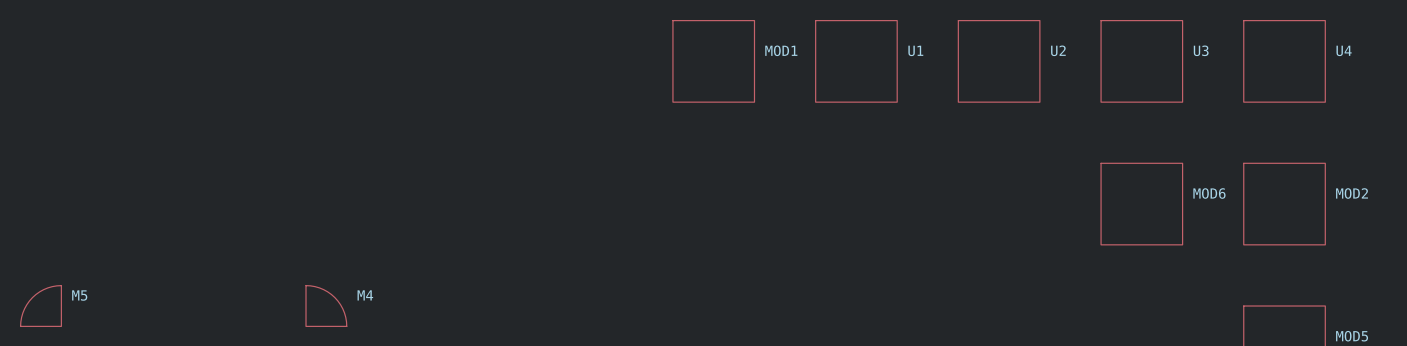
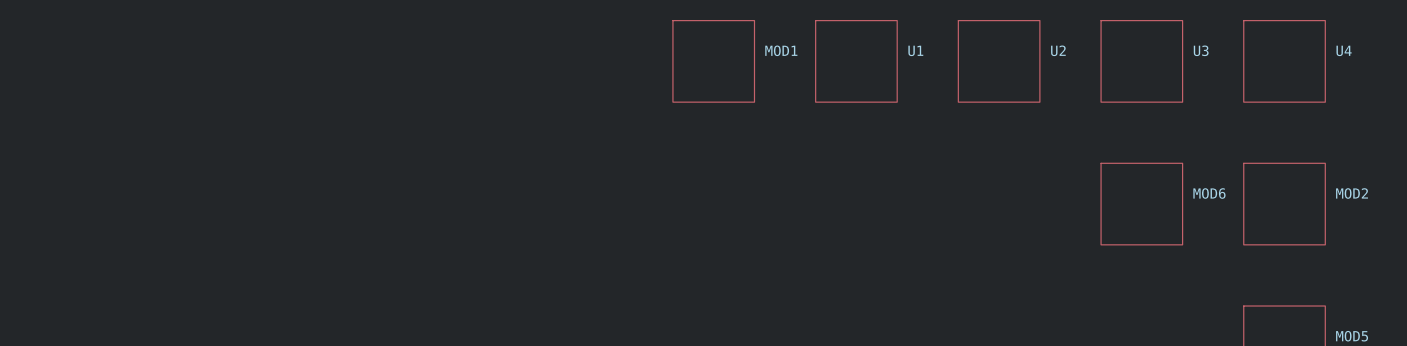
M5: (40, 306) -> none
M4: (326, 306) -> none

